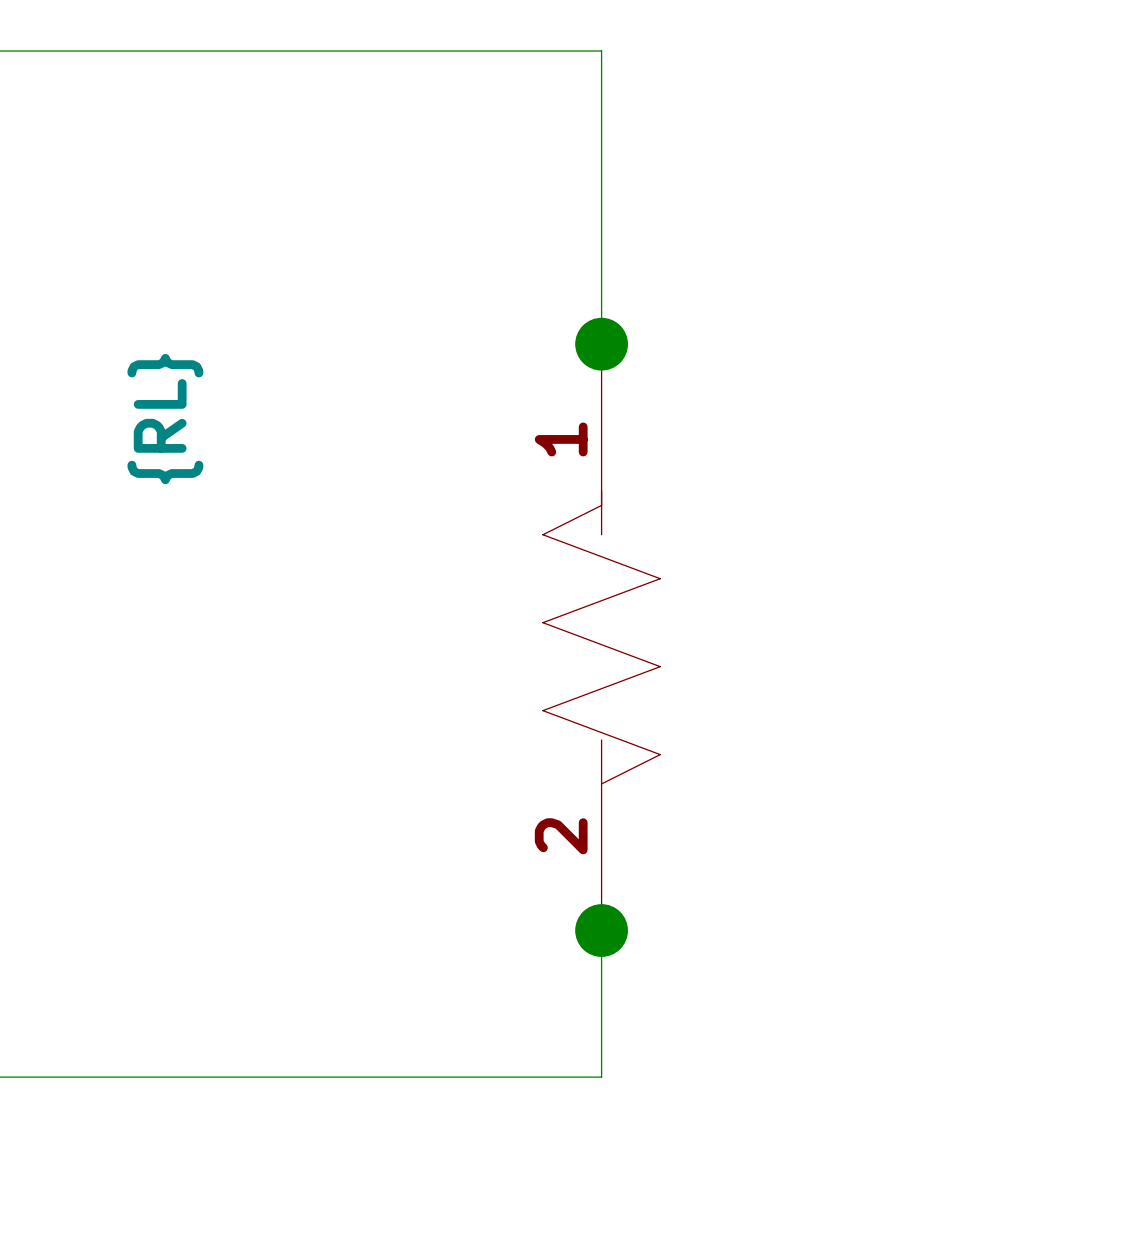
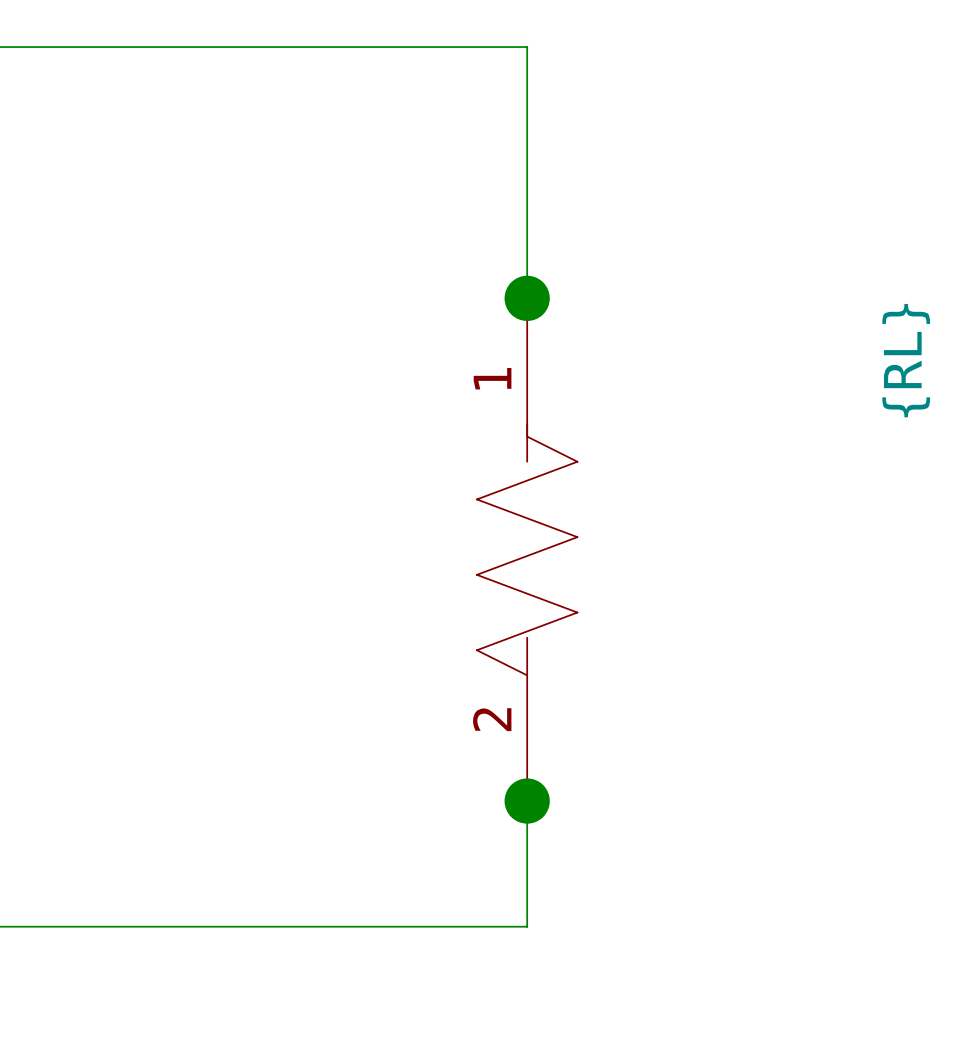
part flip: as is (601, 637) -> left-right (527, 549)

